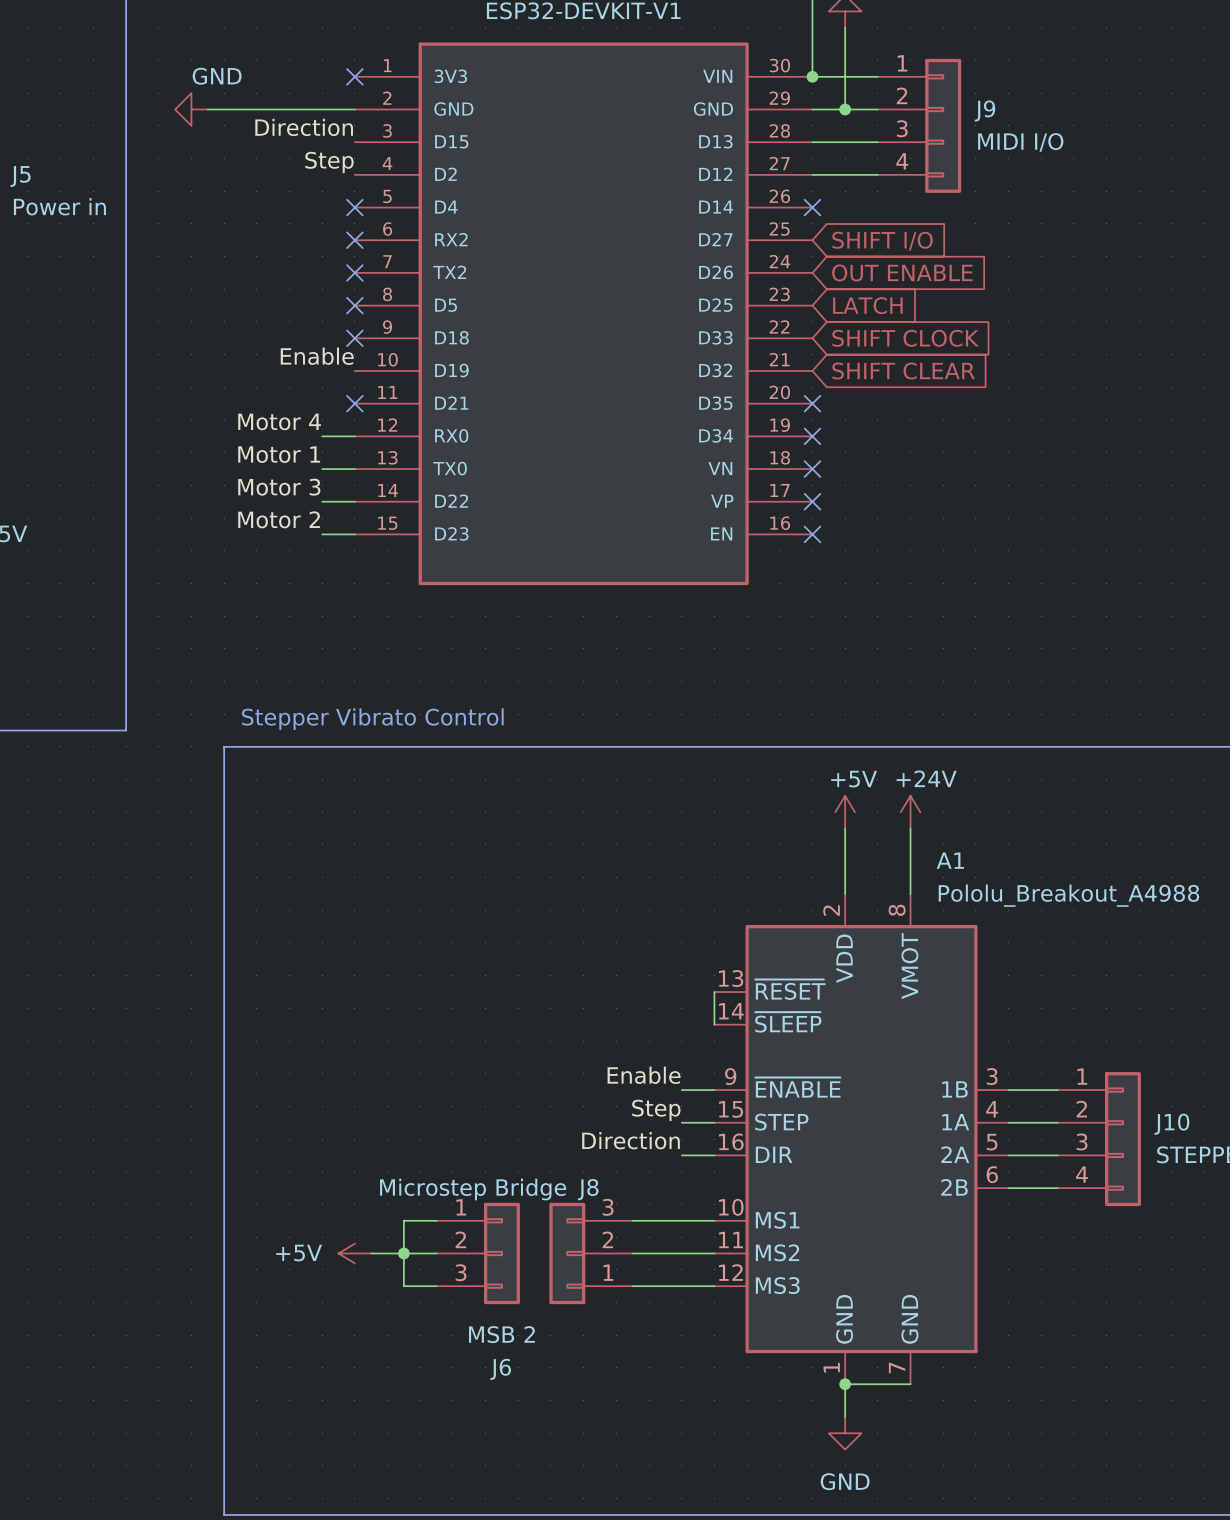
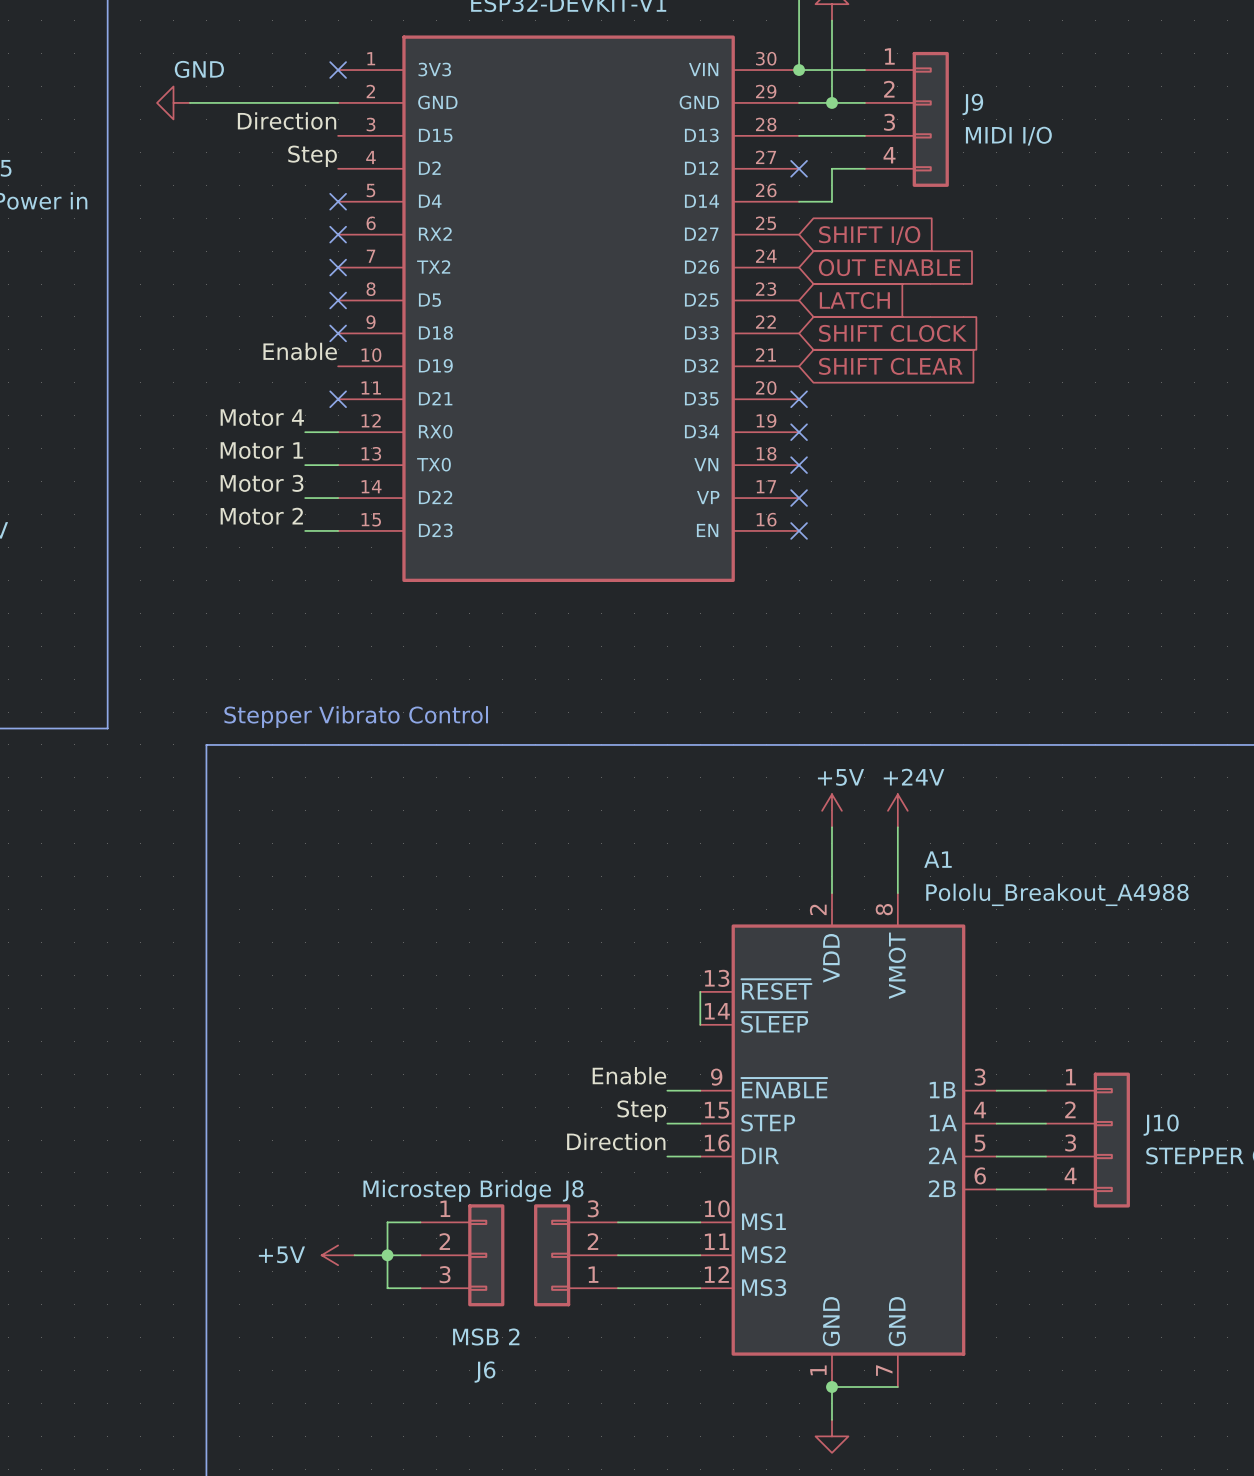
wire: (812, 174) (845, 174) -> (799, 201) (831, 201) (831, 168)
no-connect mark position: (812, 207) -> (799, 168)

